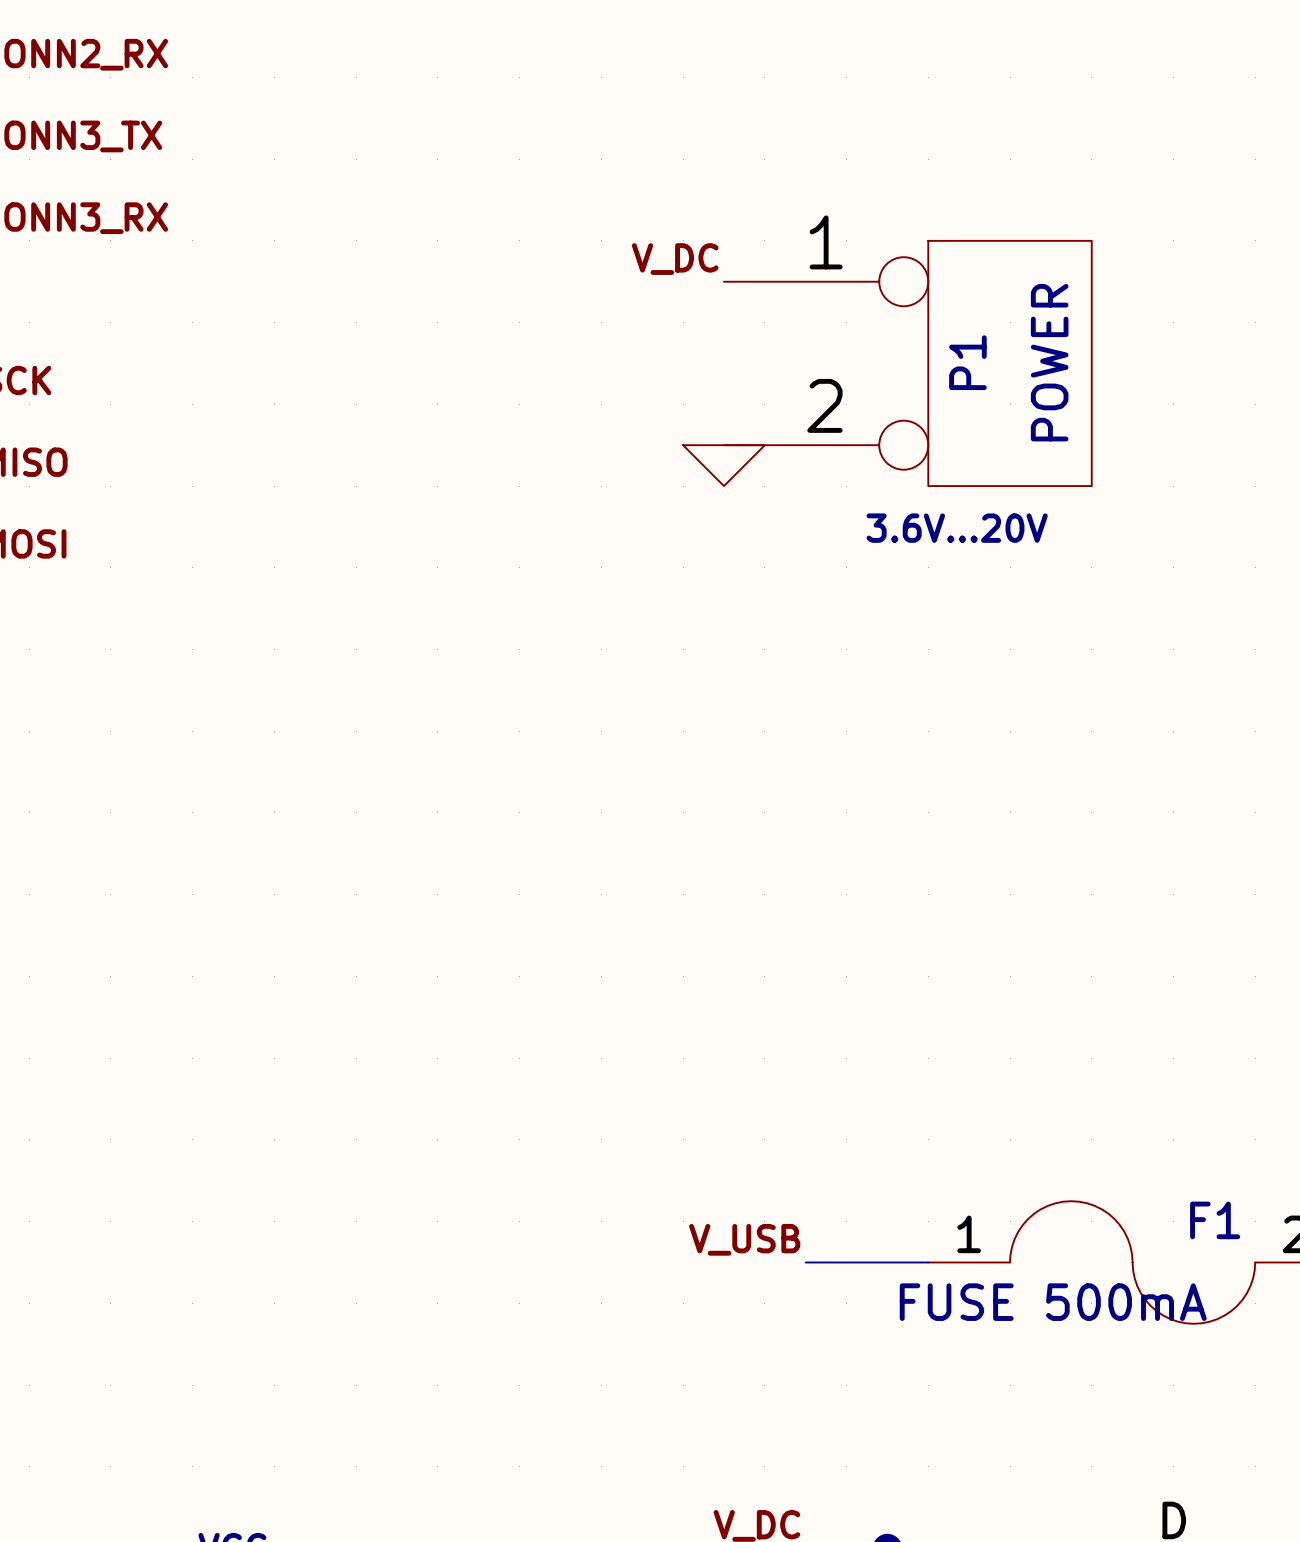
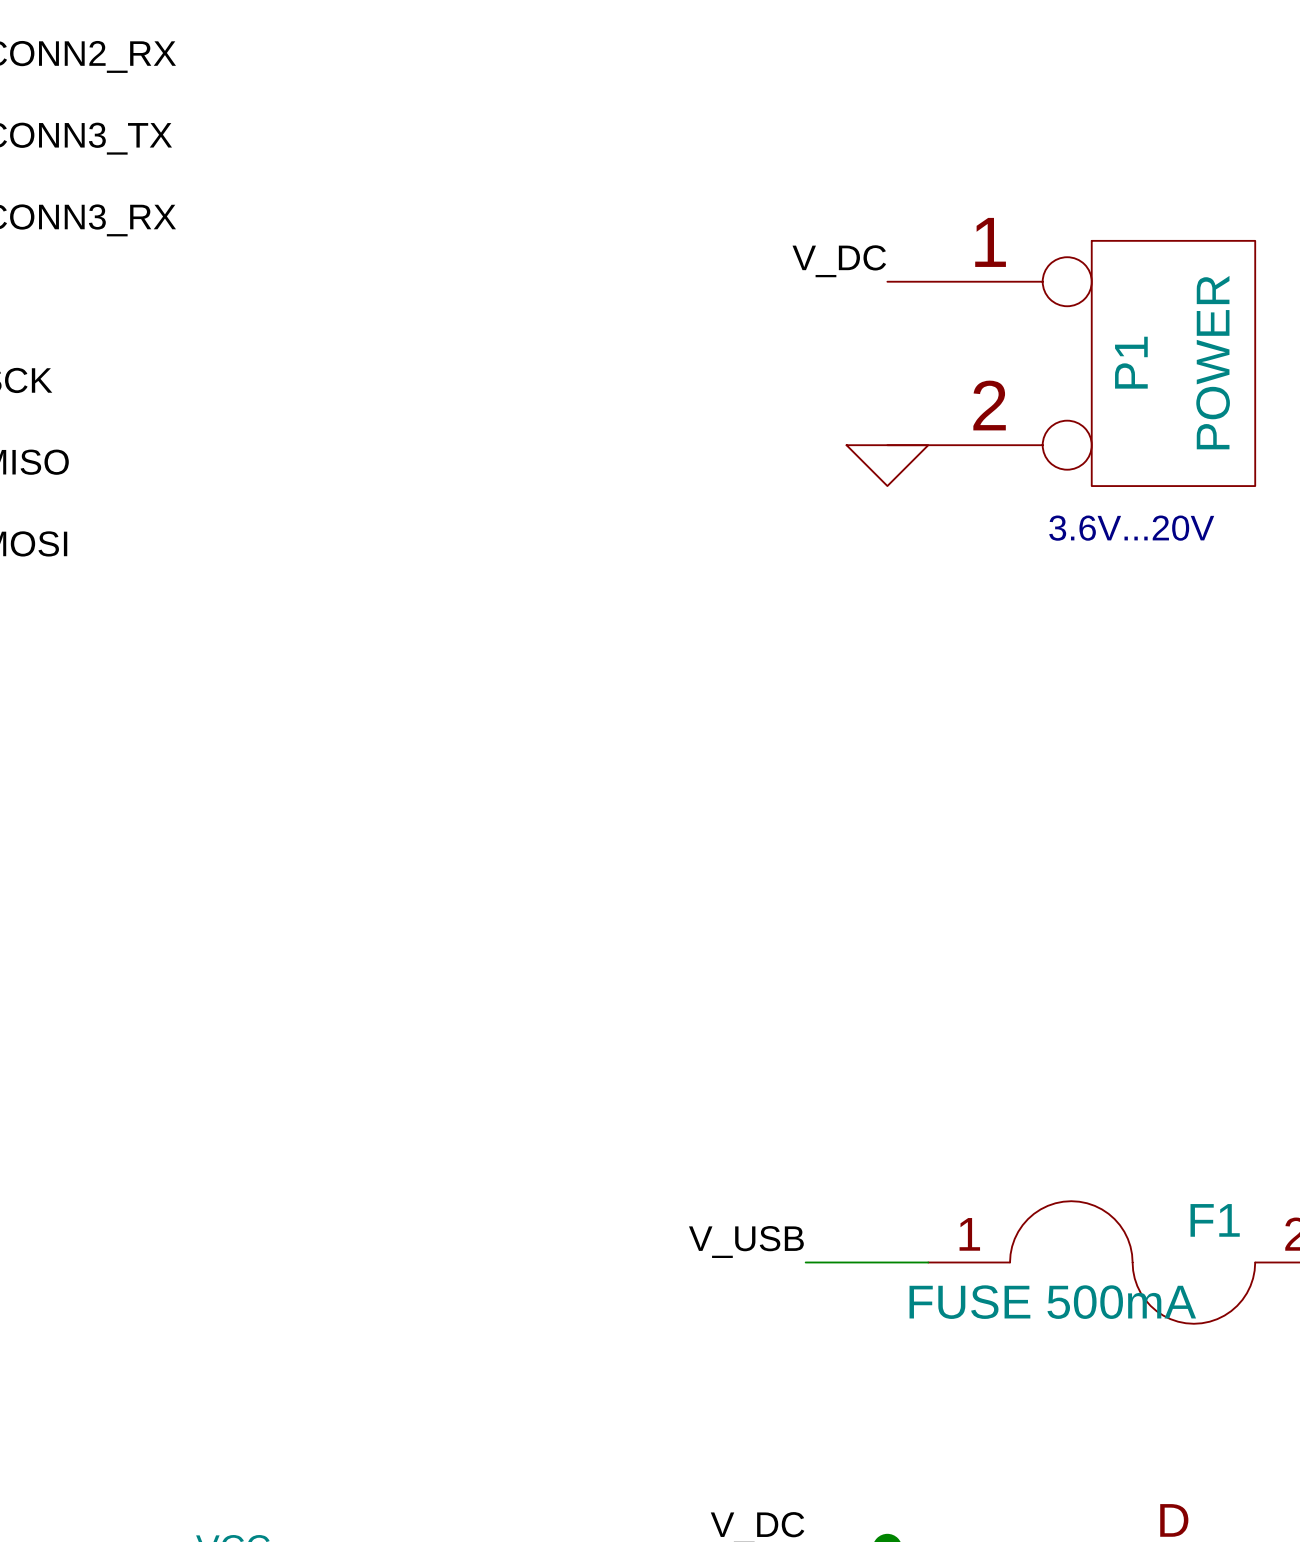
label position: V_DC (675, 259) -> V_DC (839, 261)
P1 position: (907, 363) -> (1071, 363)
power symbol position: (723, 465) -> (887, 465)
text position: 3.6V...20V (957, 528) -> 3.6V...20V (1131, 528)

